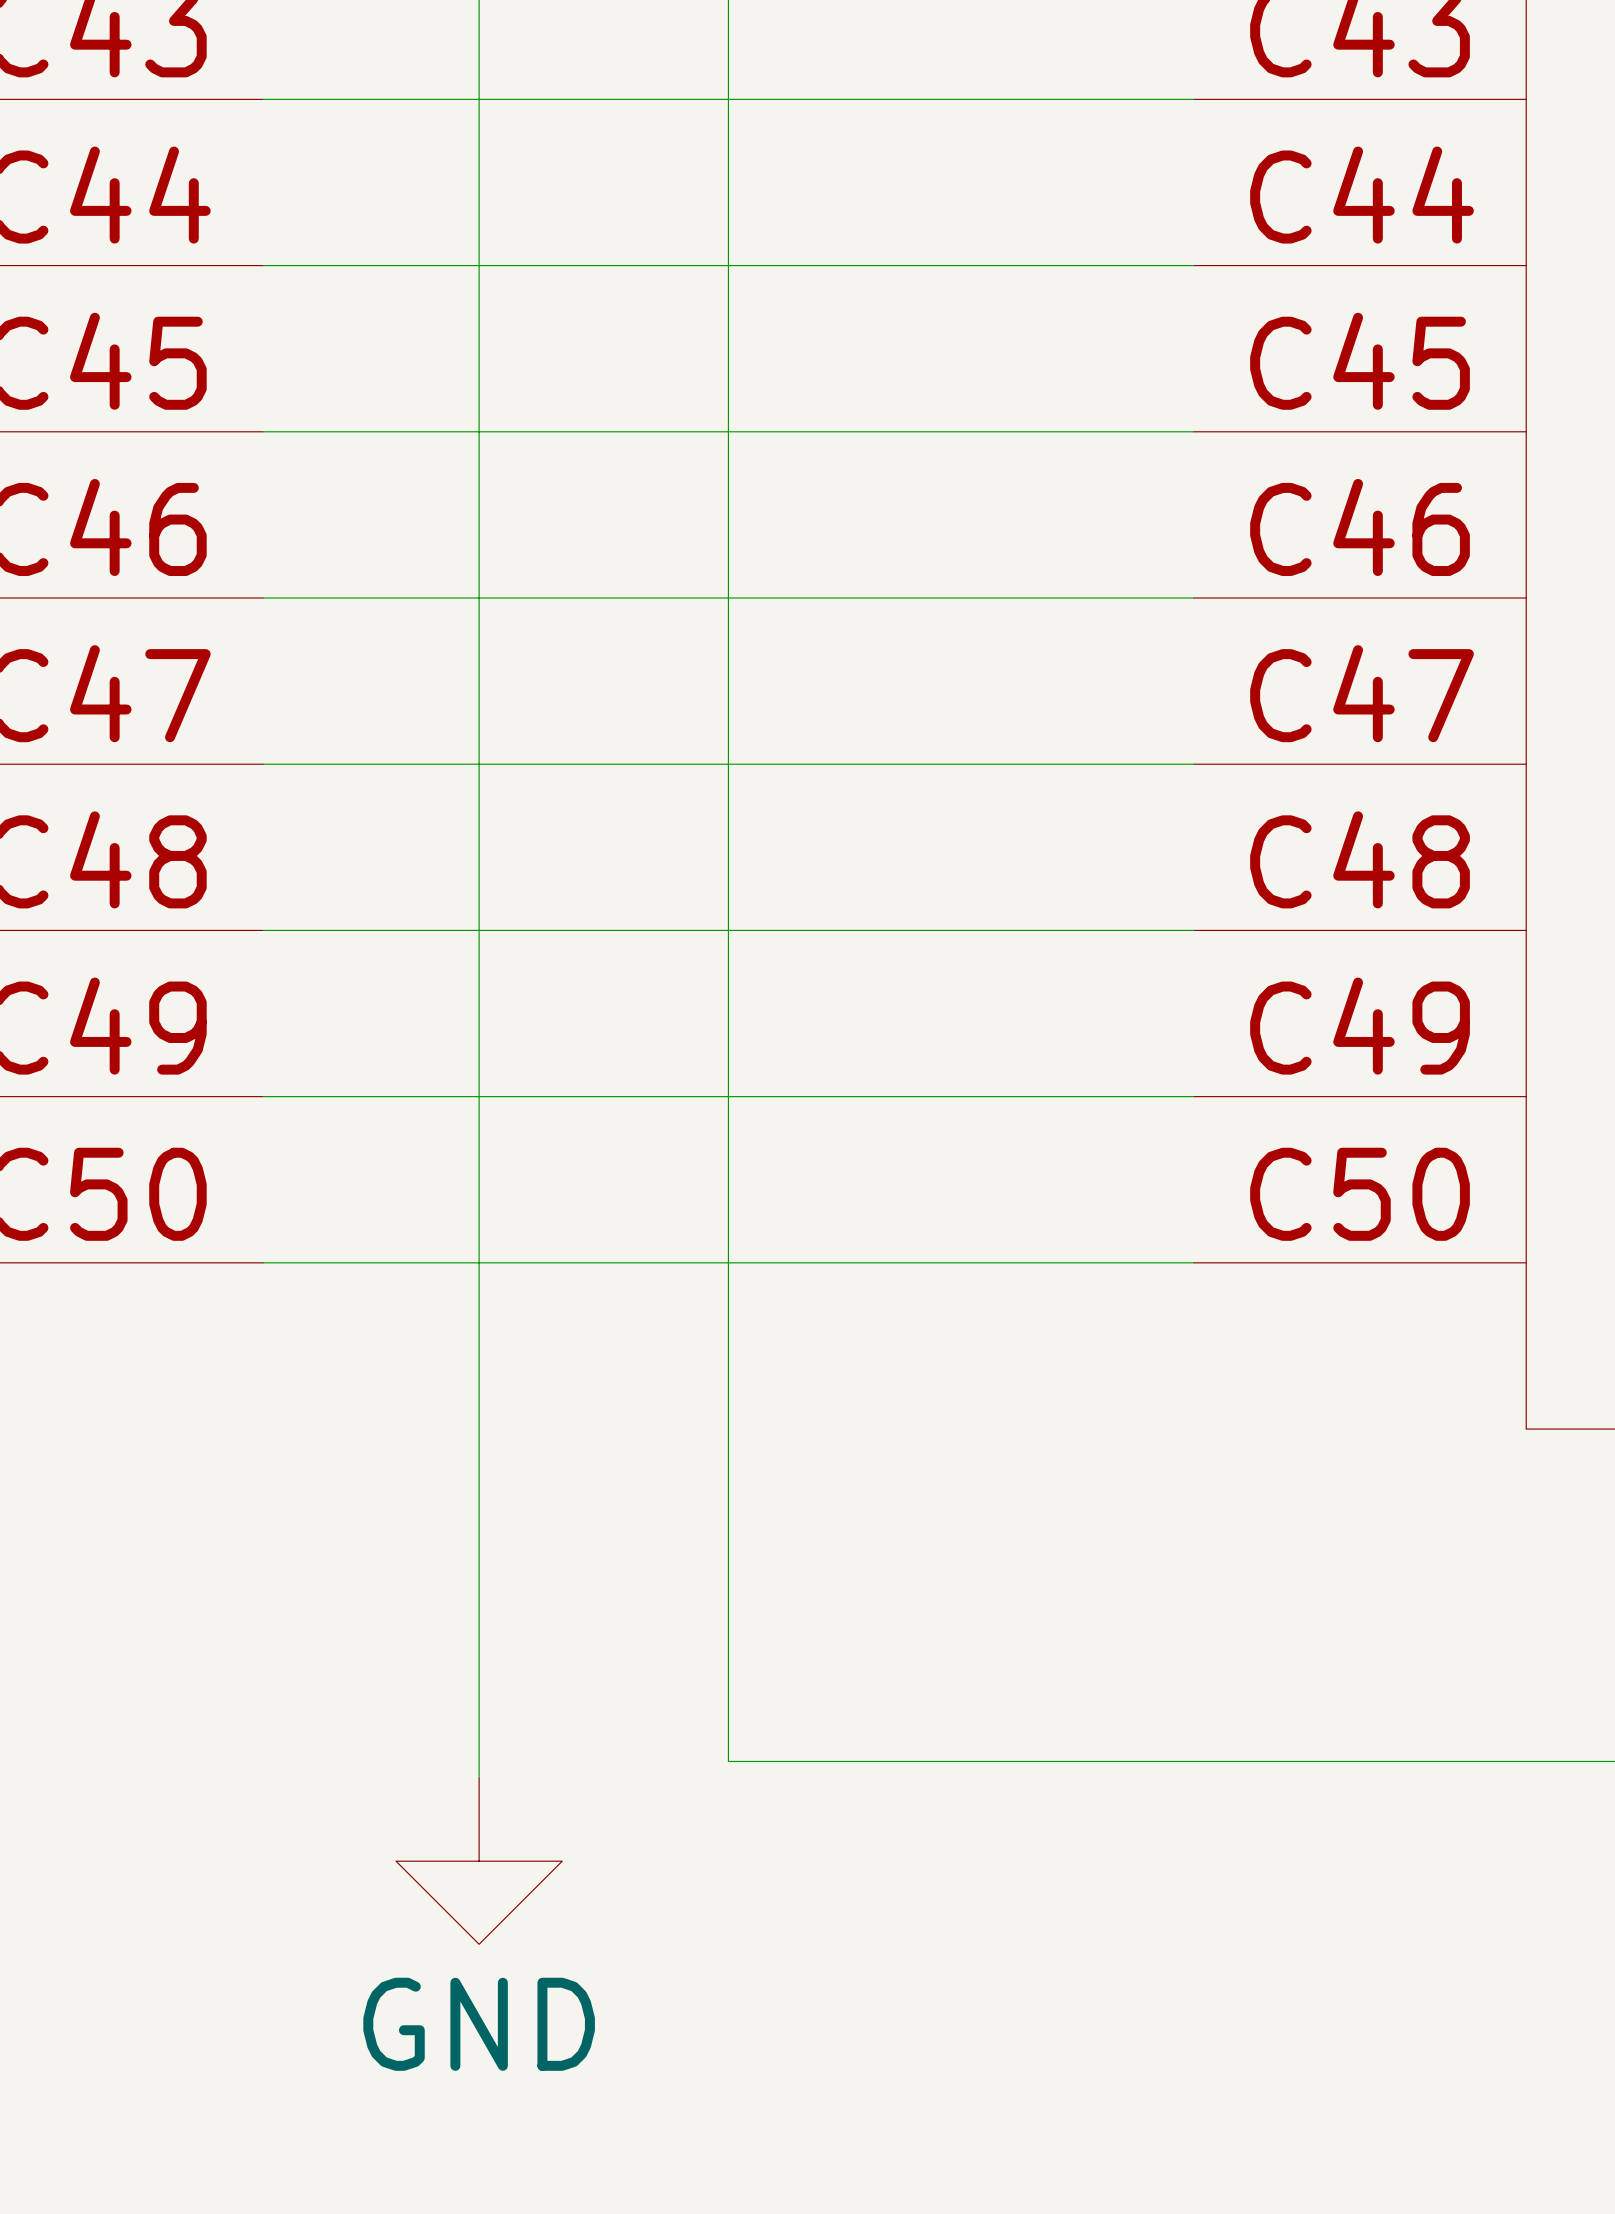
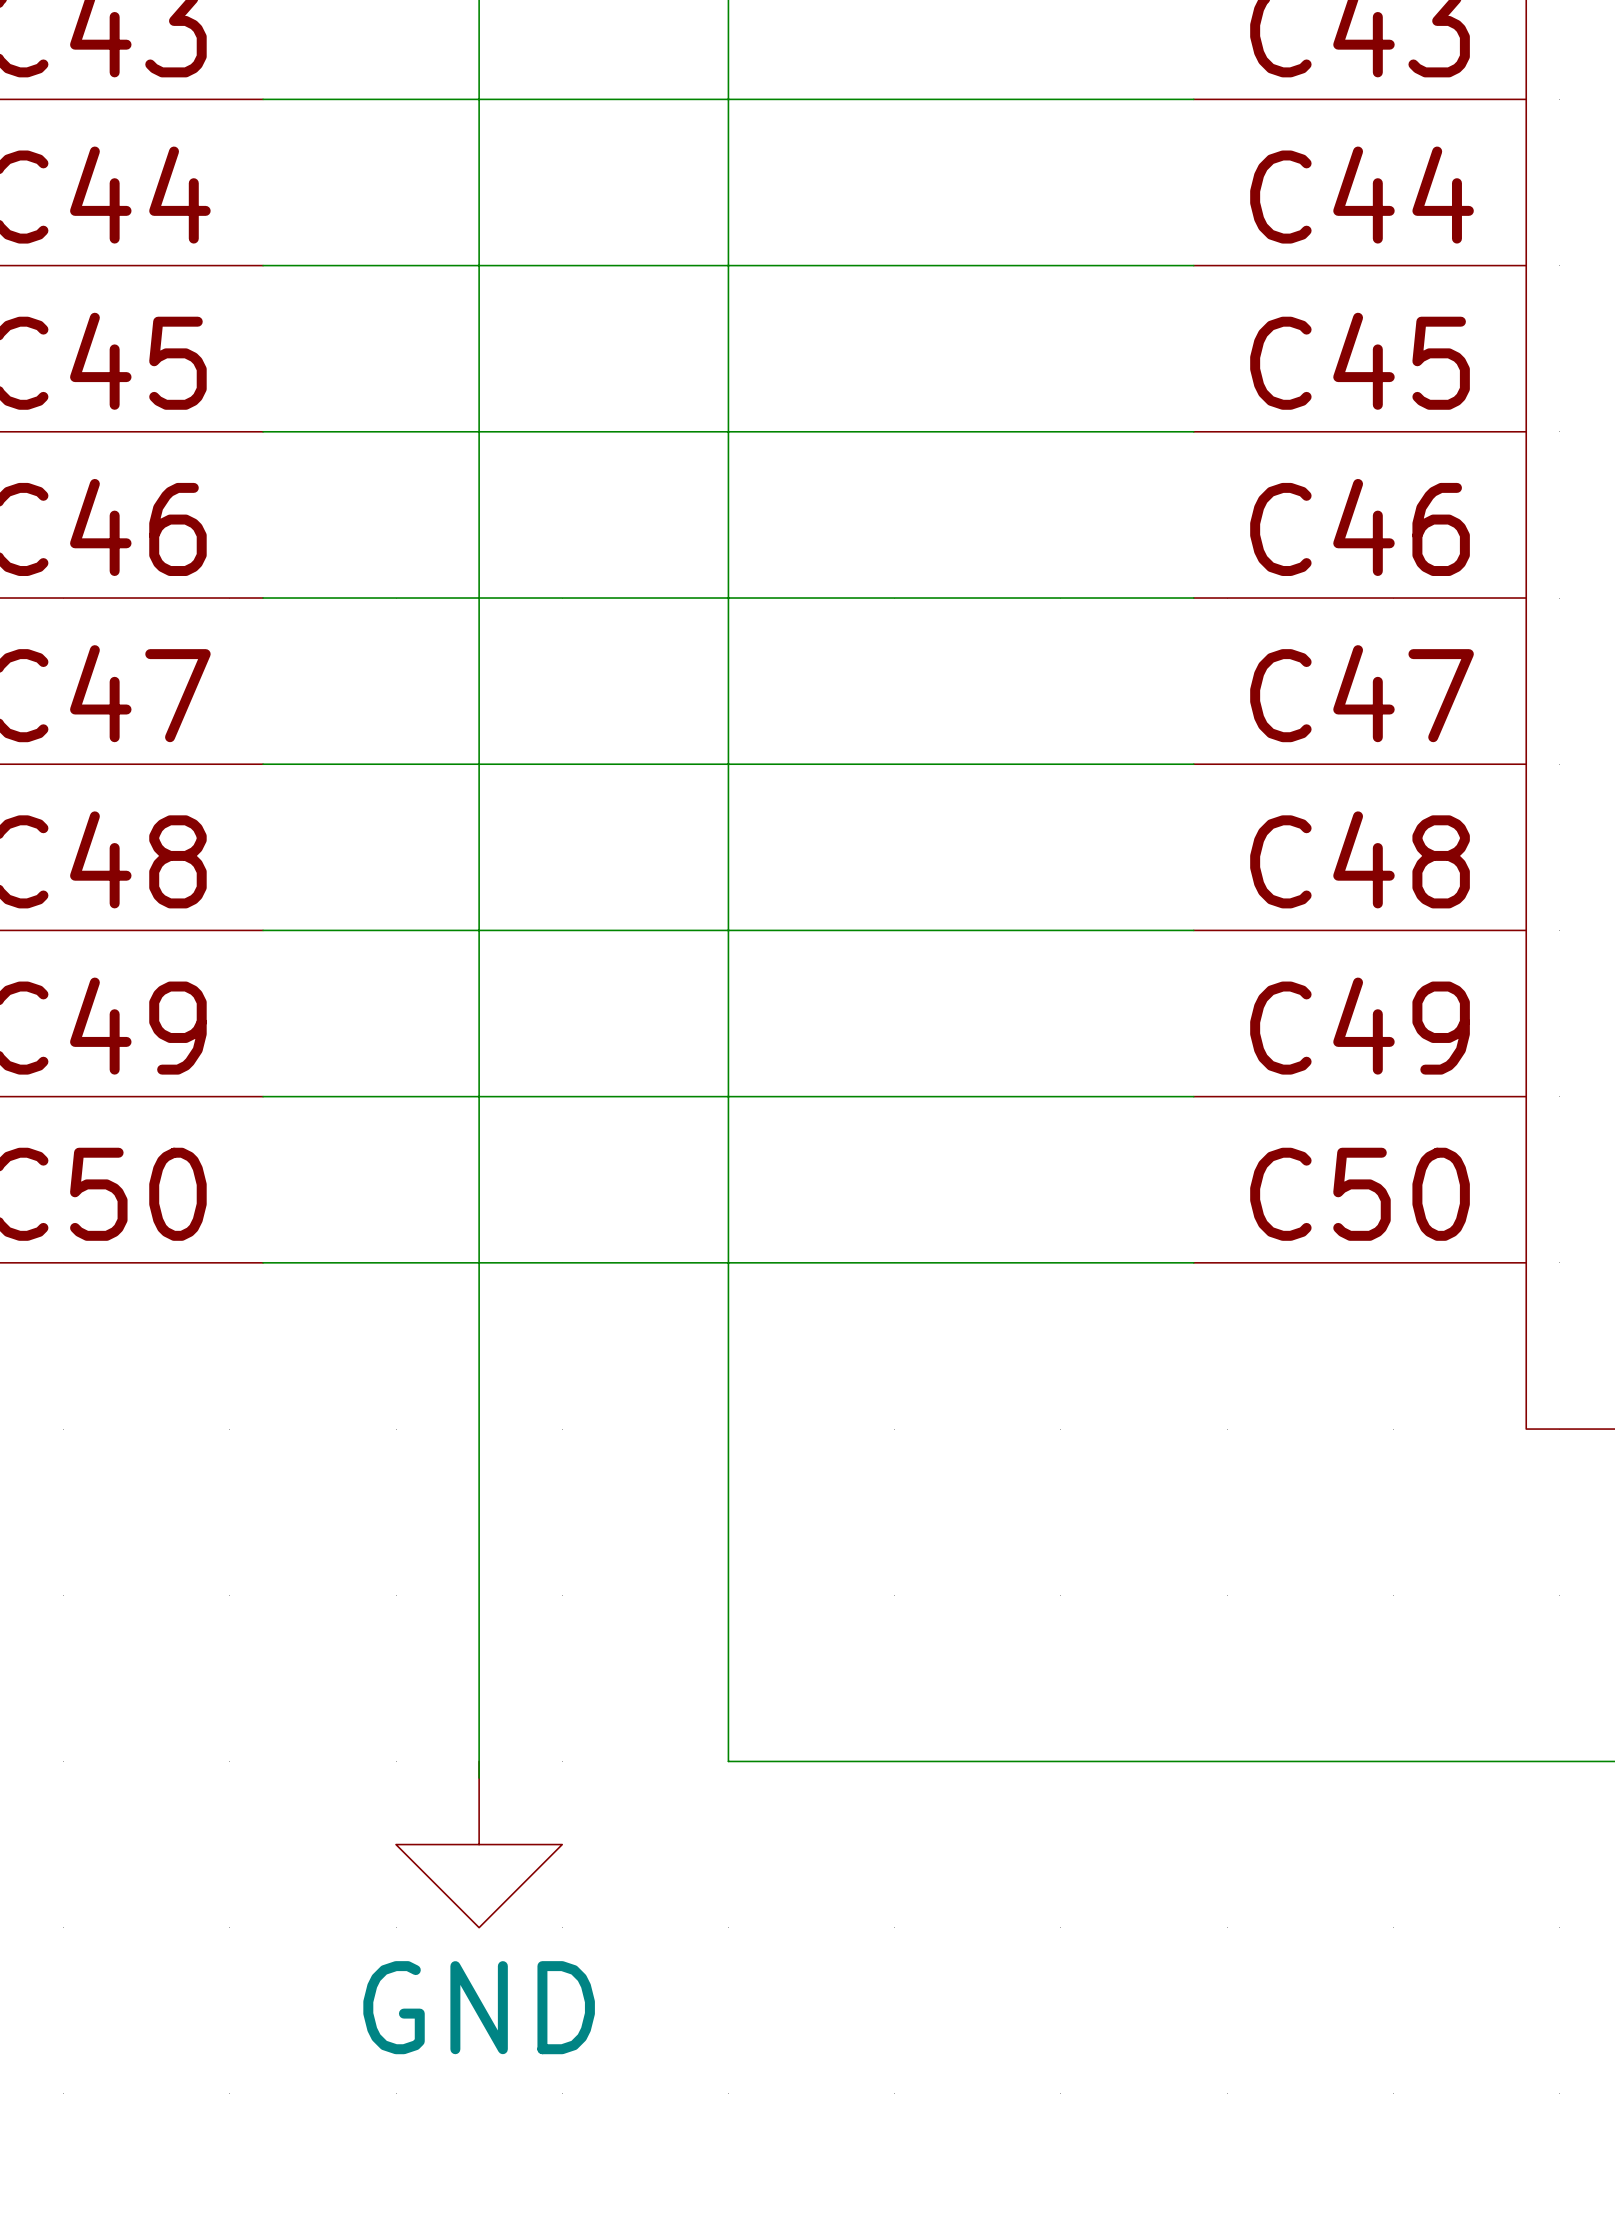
power symbol position: GND (479, 1861) -> GND (479, 1844)

